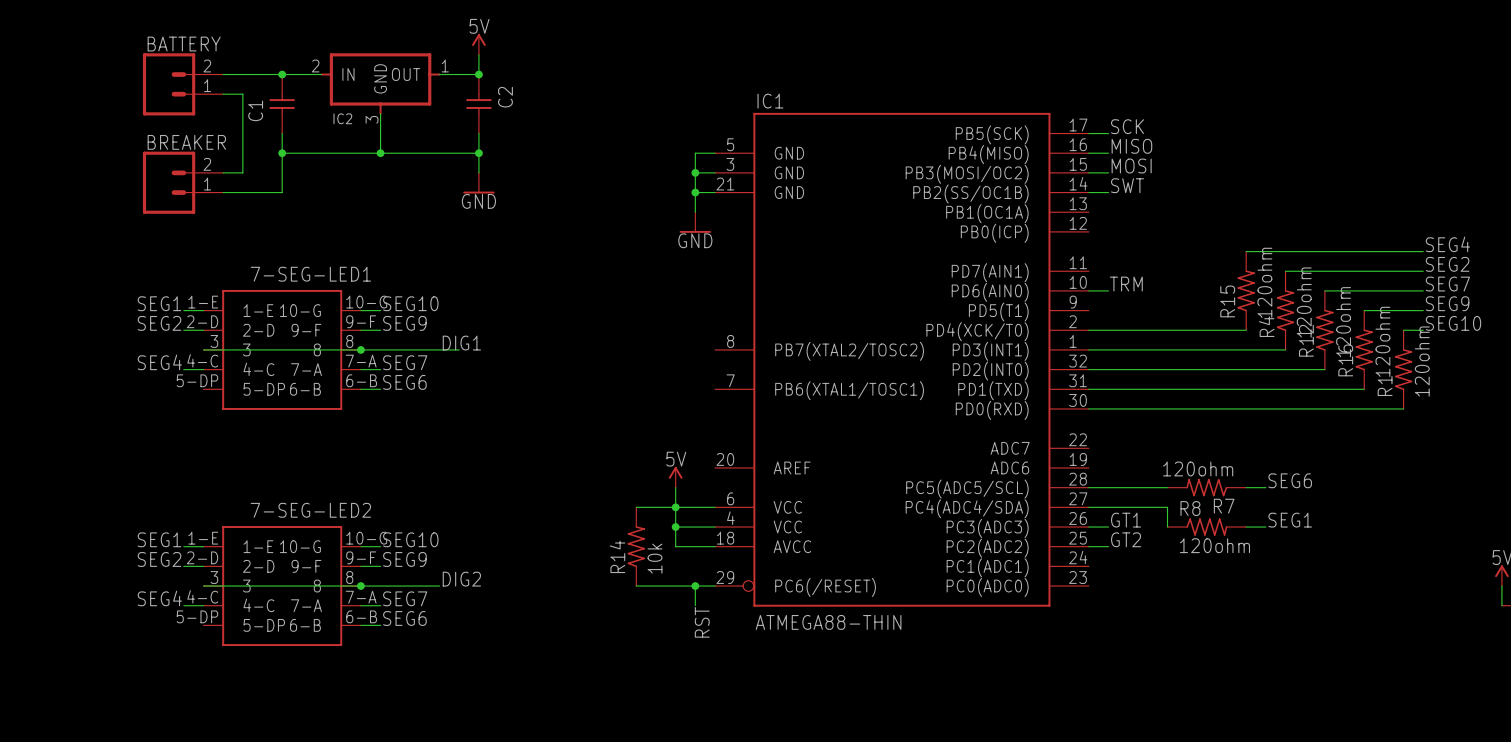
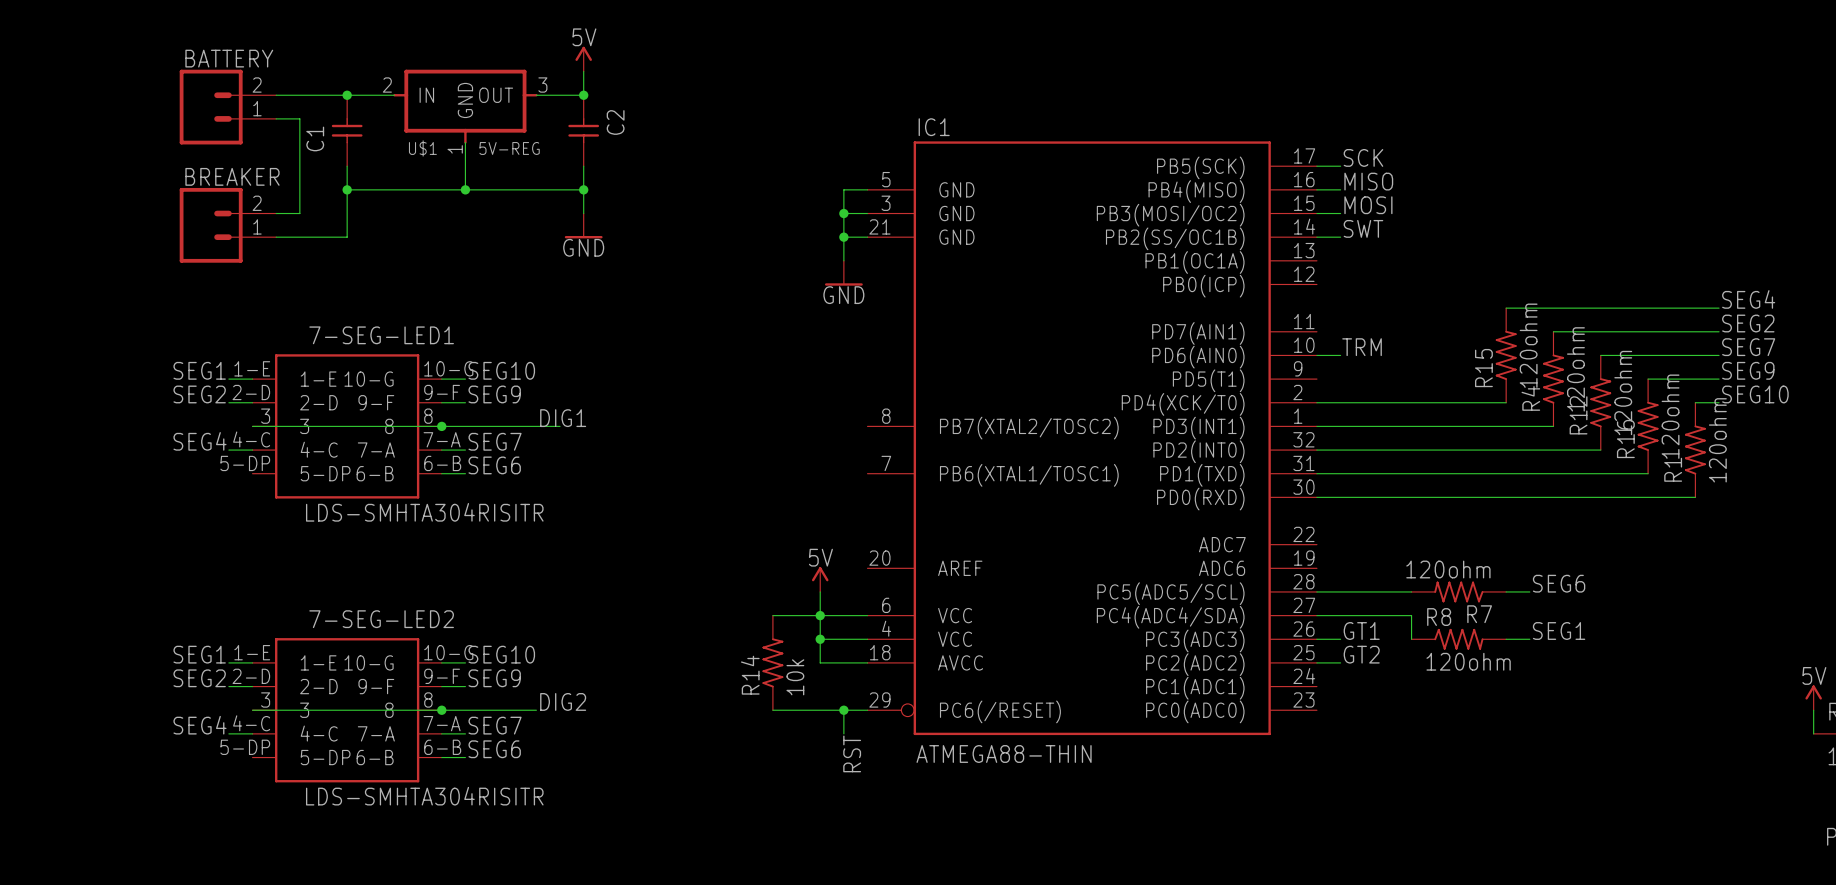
IC2 pin number: 1 (445, 66) -> 3 (542, 85)
IC2 name: IC2 (342, 118) -> U$1 (422, 148)
IC2 value: none -> 5V-REG (509, 148)
IC2 pin number: 3 (372, 119) -> 1 (455, 149)
7-SEG-LED1 value: none -> LDS-SMHTA304RISITR (424, 512)
7-SEG-LED2 value: none -> LDS-SMHTA304RISITR (424, 796)

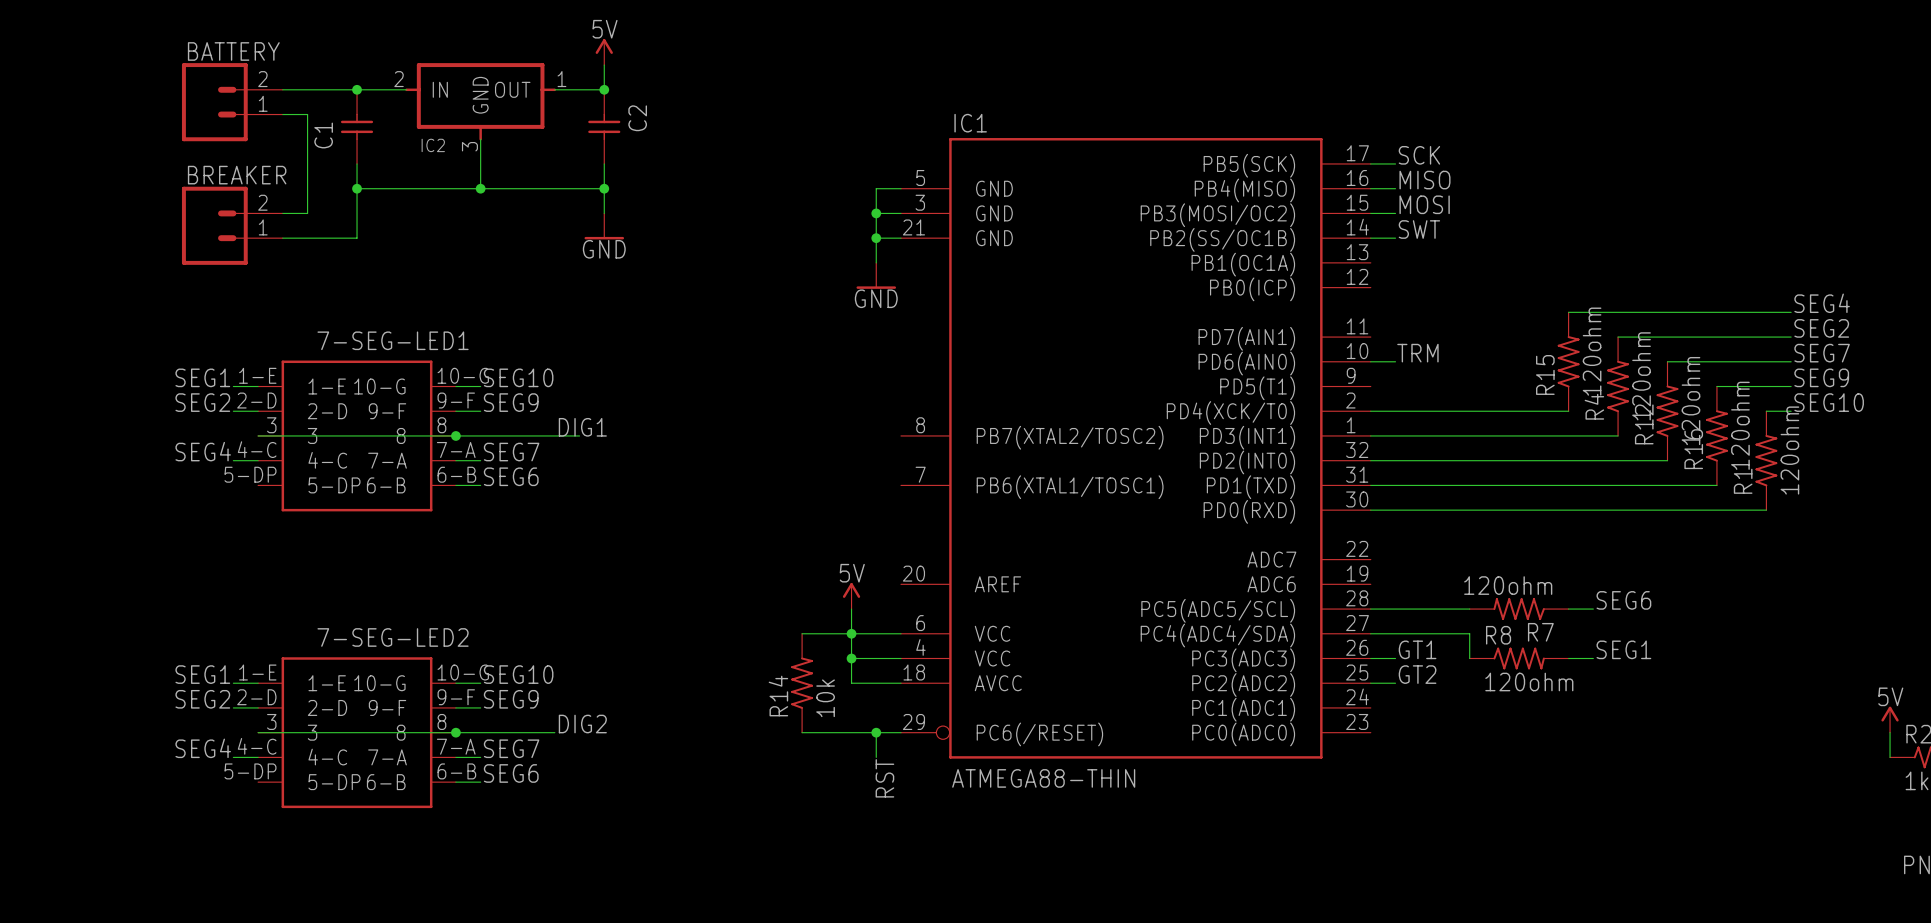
U$1 pin number: 3 (542, 85) -> 1 (561, 79)
U$1 name: U$1 (422, 148) -> IC2 (433, 145)
U$1 value: 5V-REG (509, 148) -> none
U$1 pin number: 1 (455, 149) -> 3 (469, 146)
7-SEG-LED1 value: LDS-SMHTA304RISITR (424, 512) -> none
7-SEG-LED2 value: LDS-SMHTA304RISITR (424, 796) -> none

